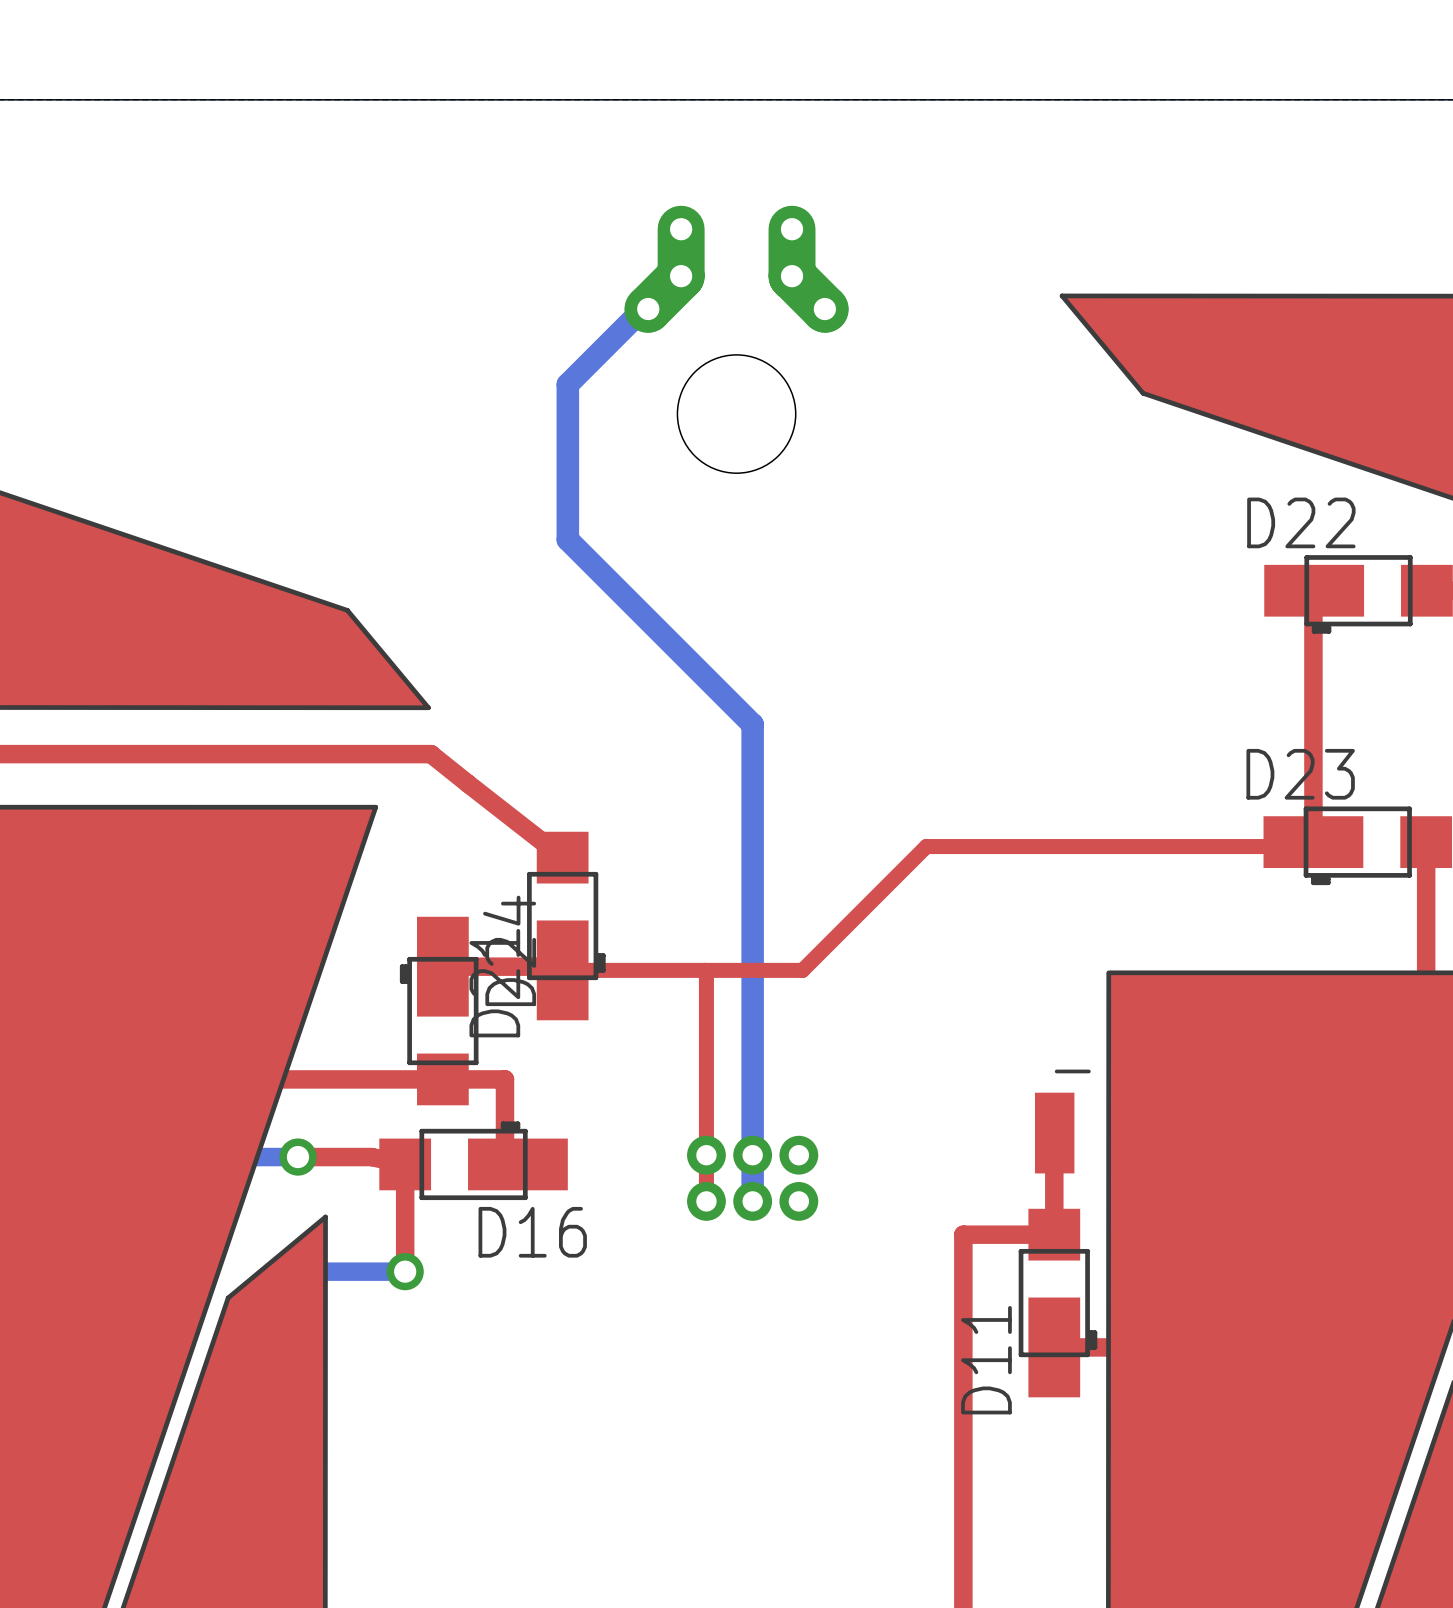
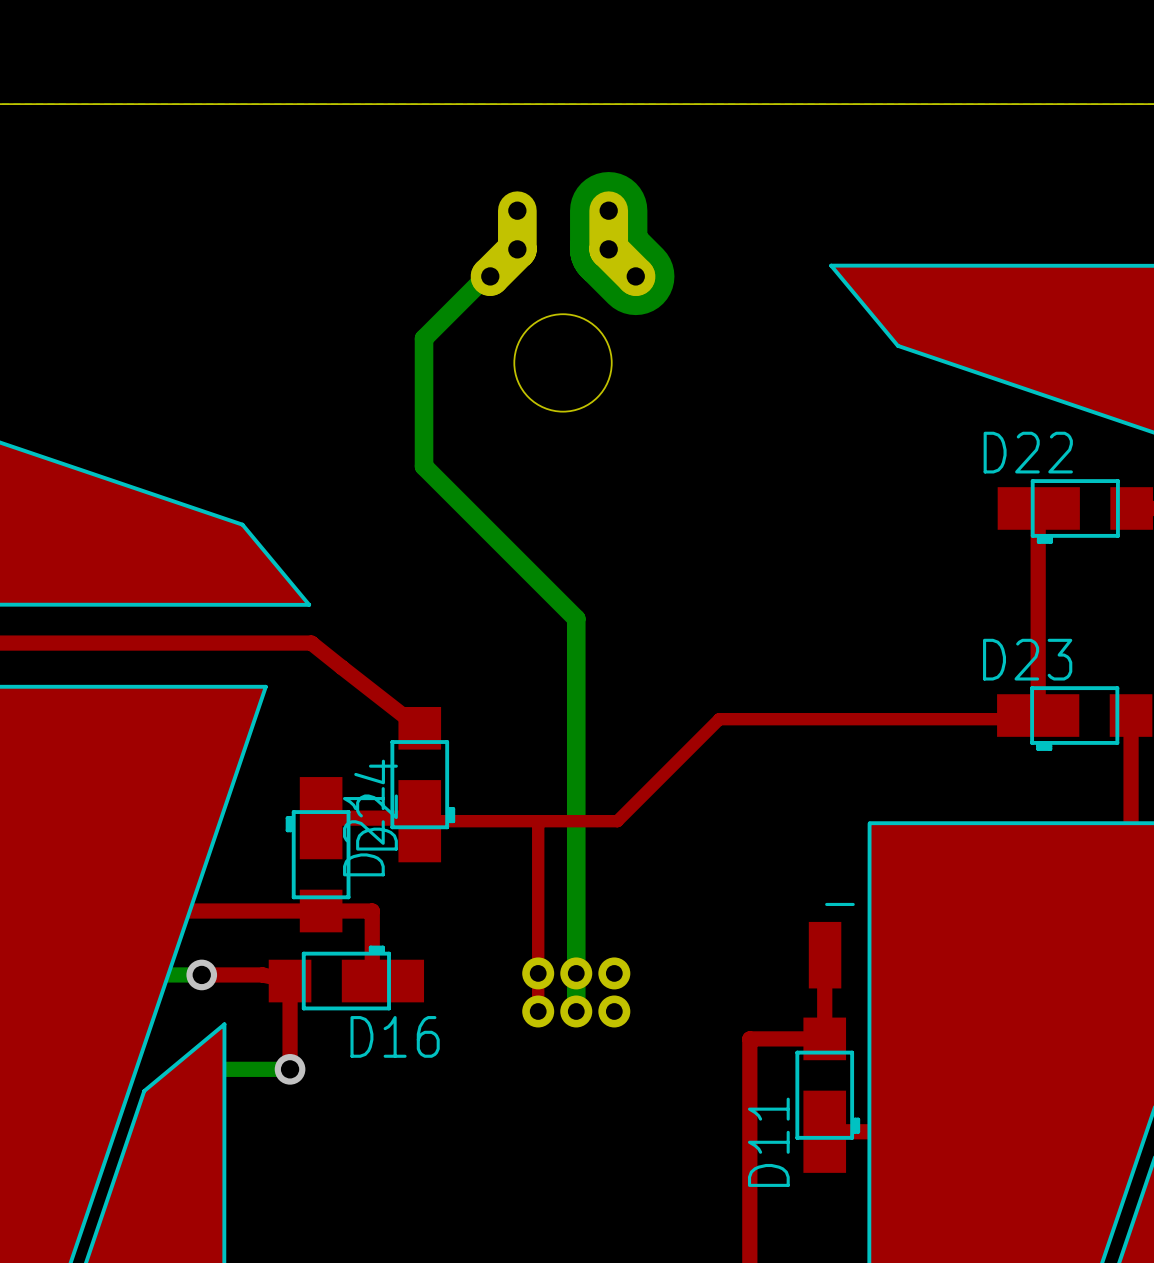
bottom track: none -> (608, 210) (608, 249) (635, 276)

